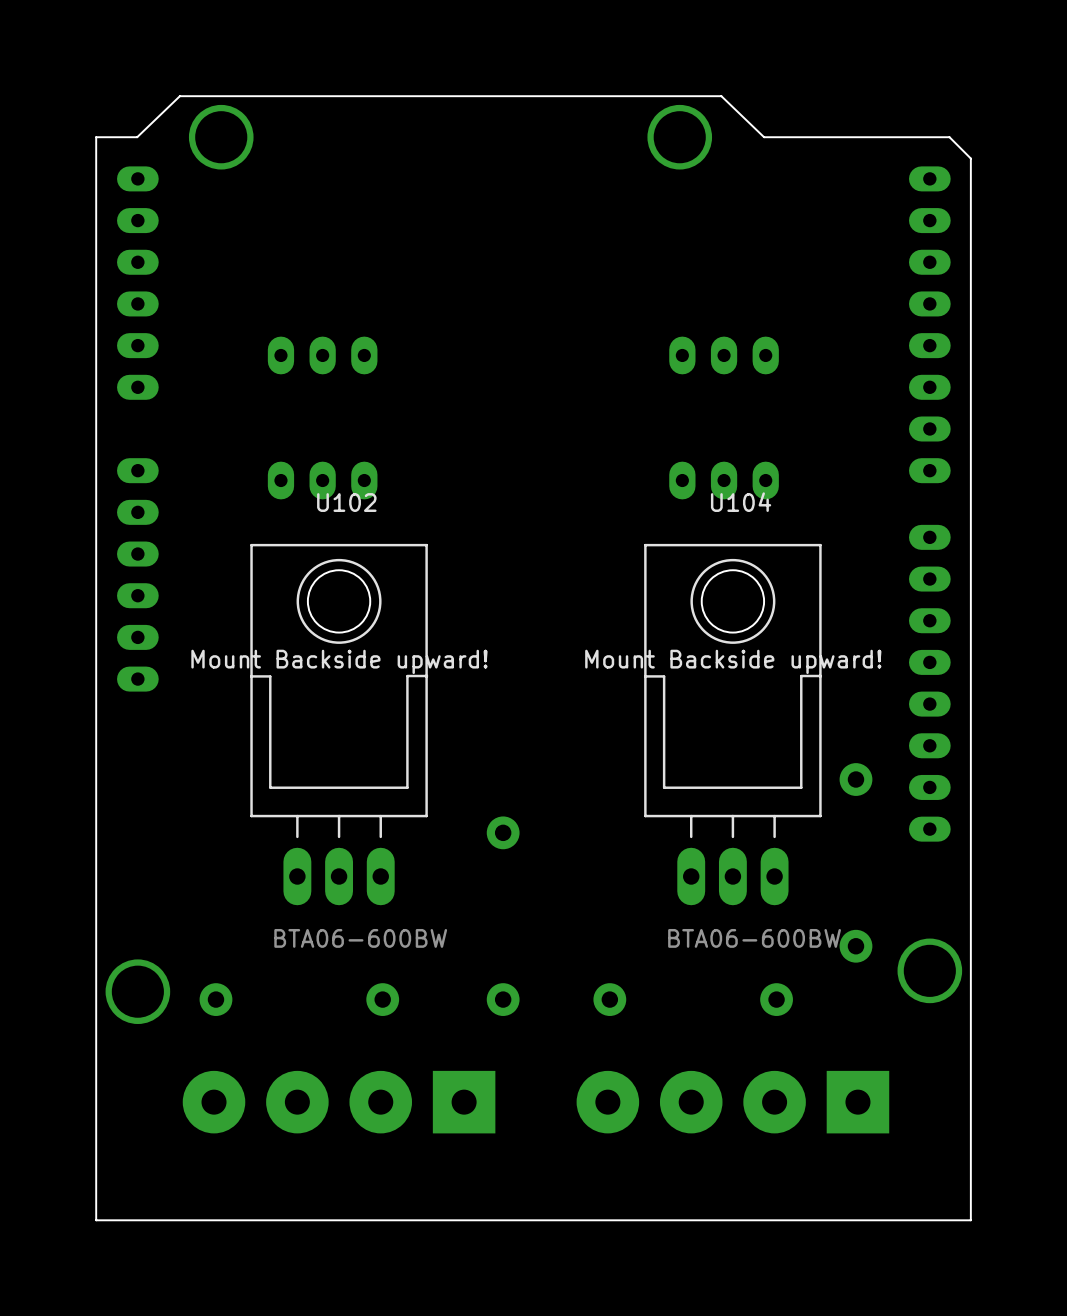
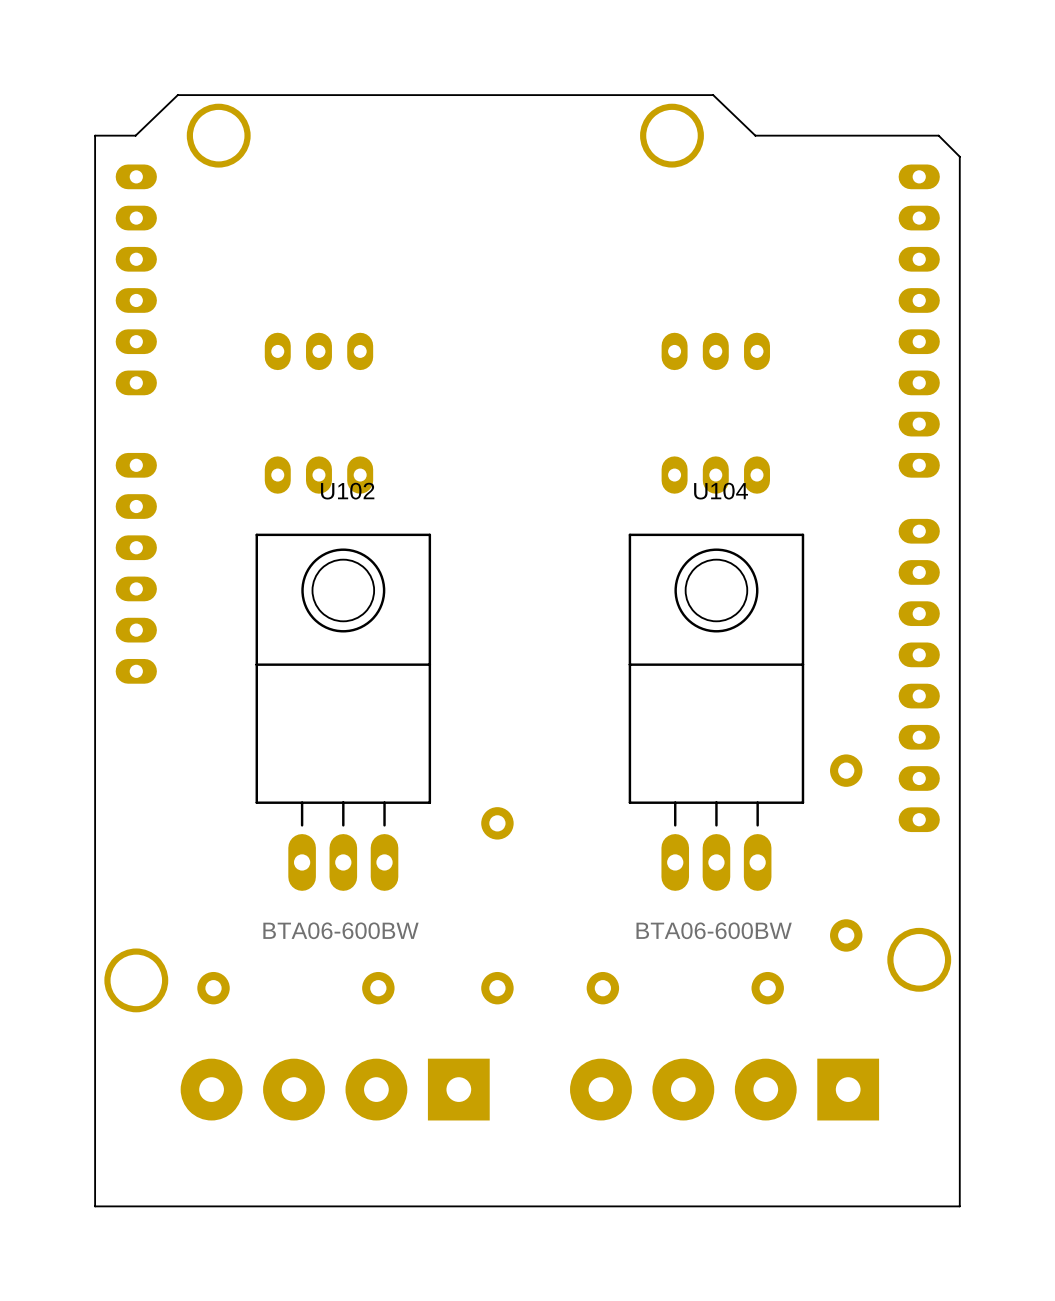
U102 footprint: [250, 543, 429, 906] -> [255, 533, 432, 891]
U104 footprint: [644, 543, 823, 906] -> [628, 533, 805, 891]

